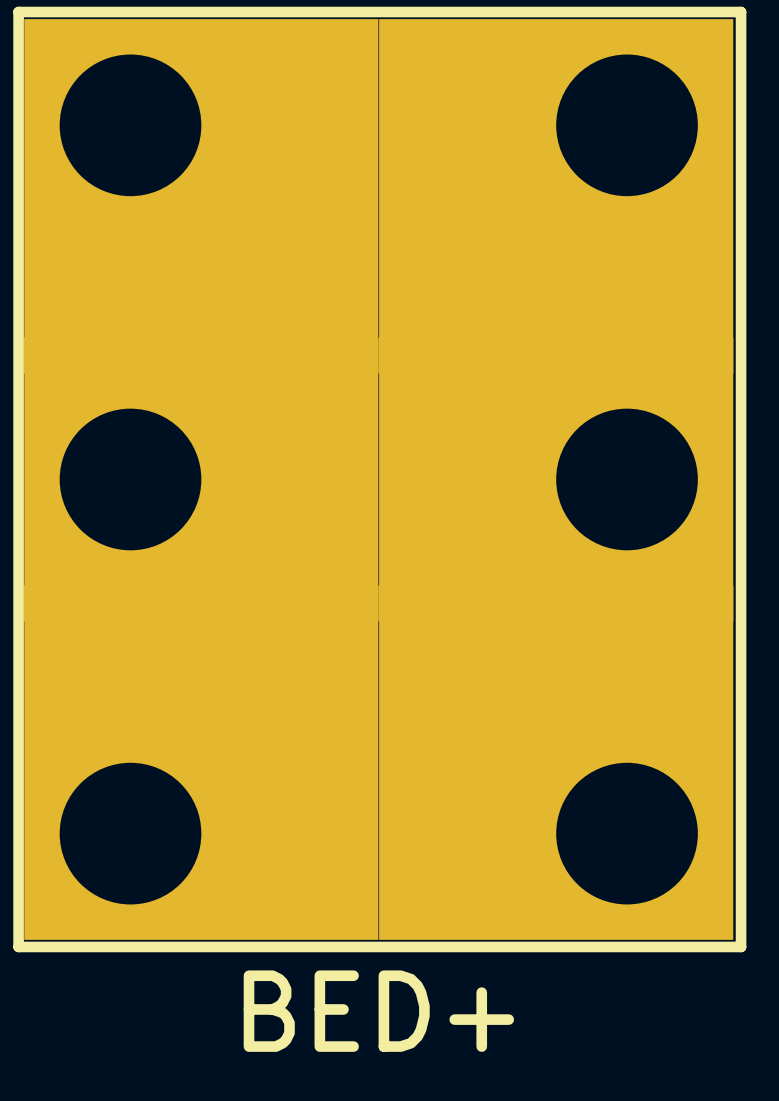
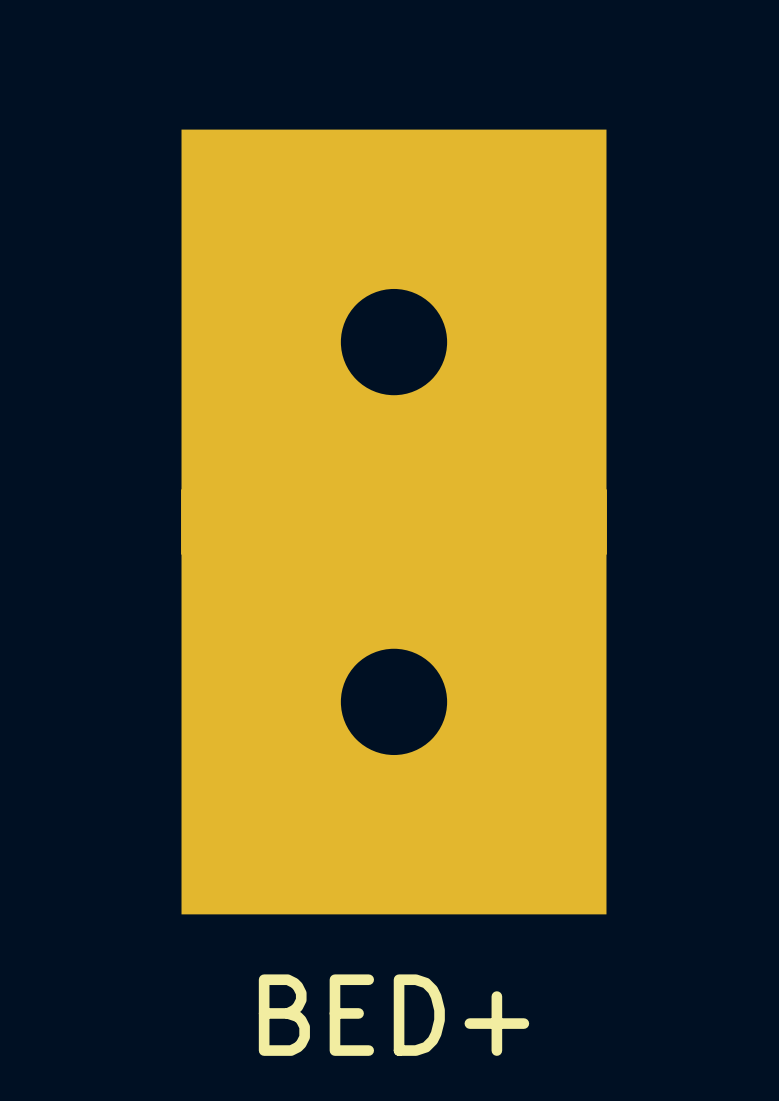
BED+ footprint: [13, 6, 747, 953] -> [181, 129, 607, 915]

